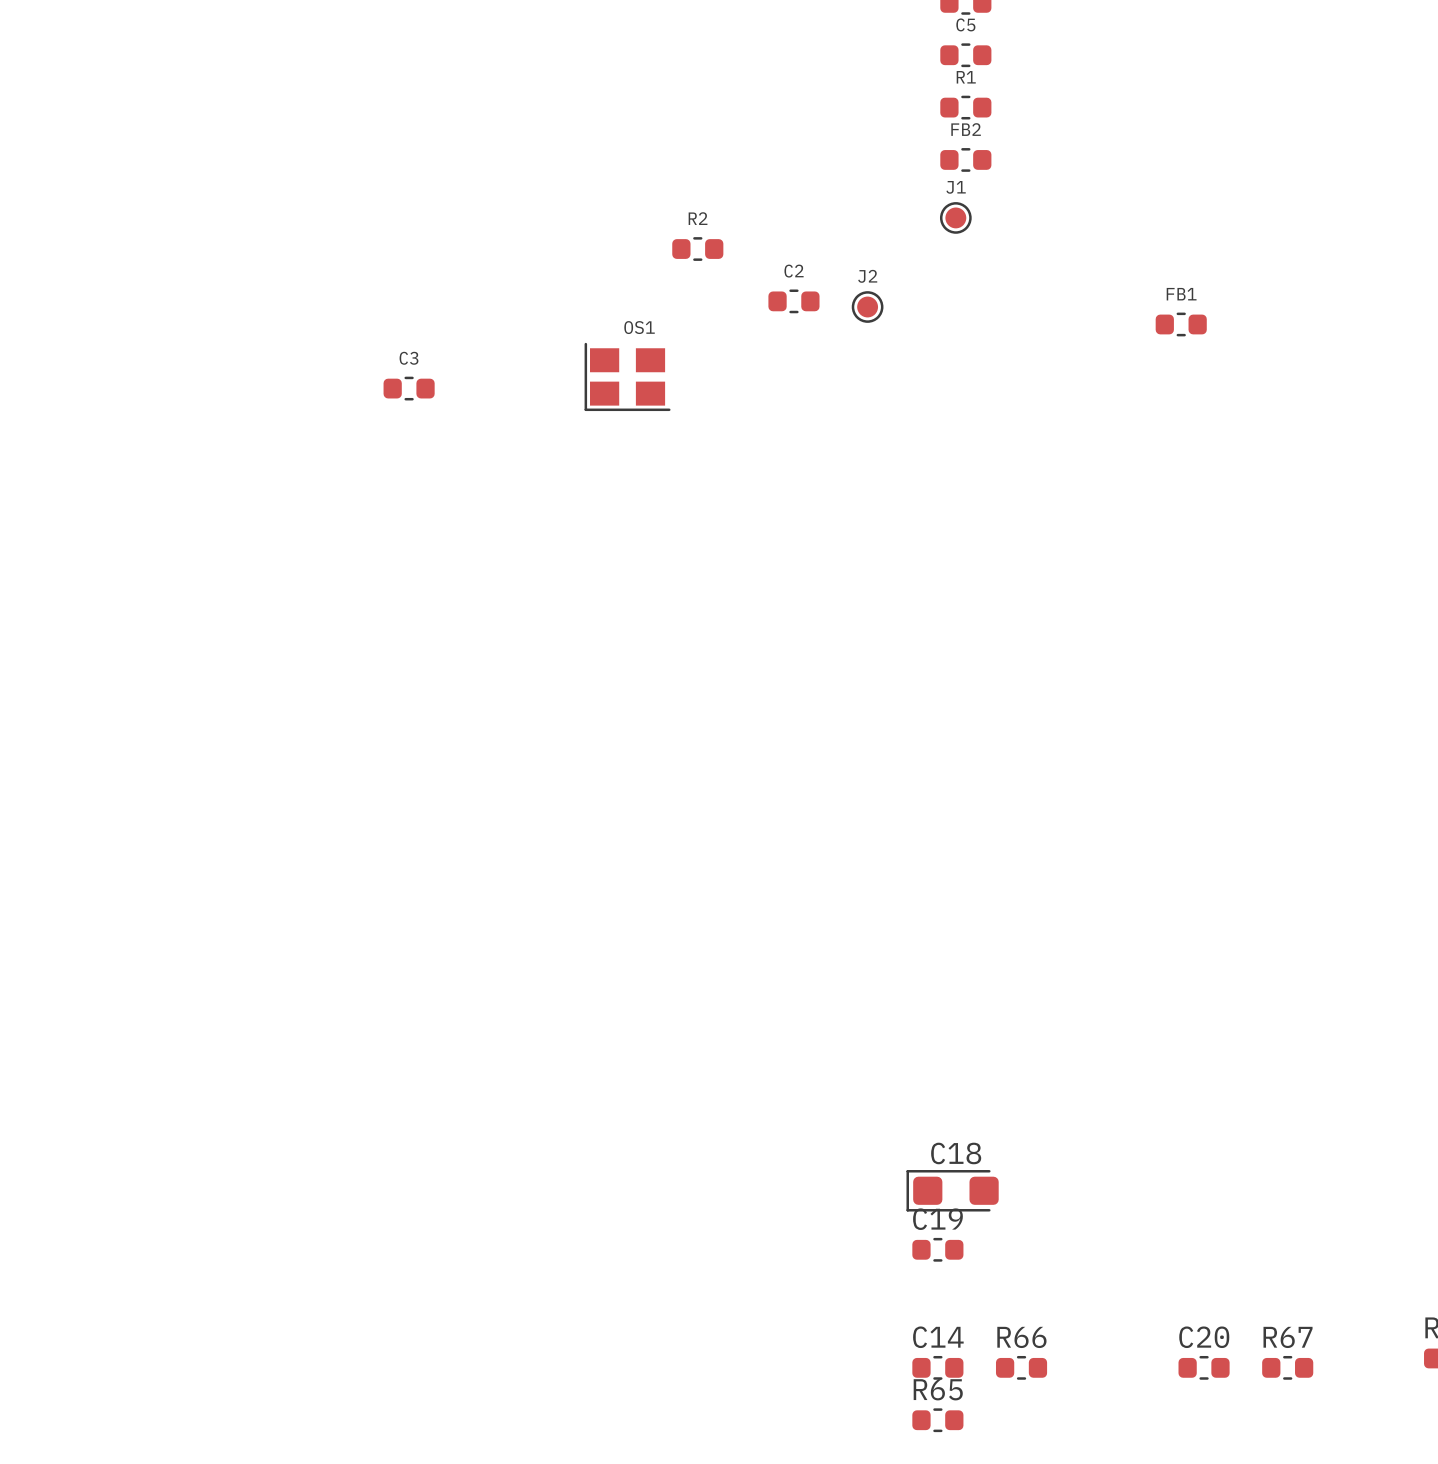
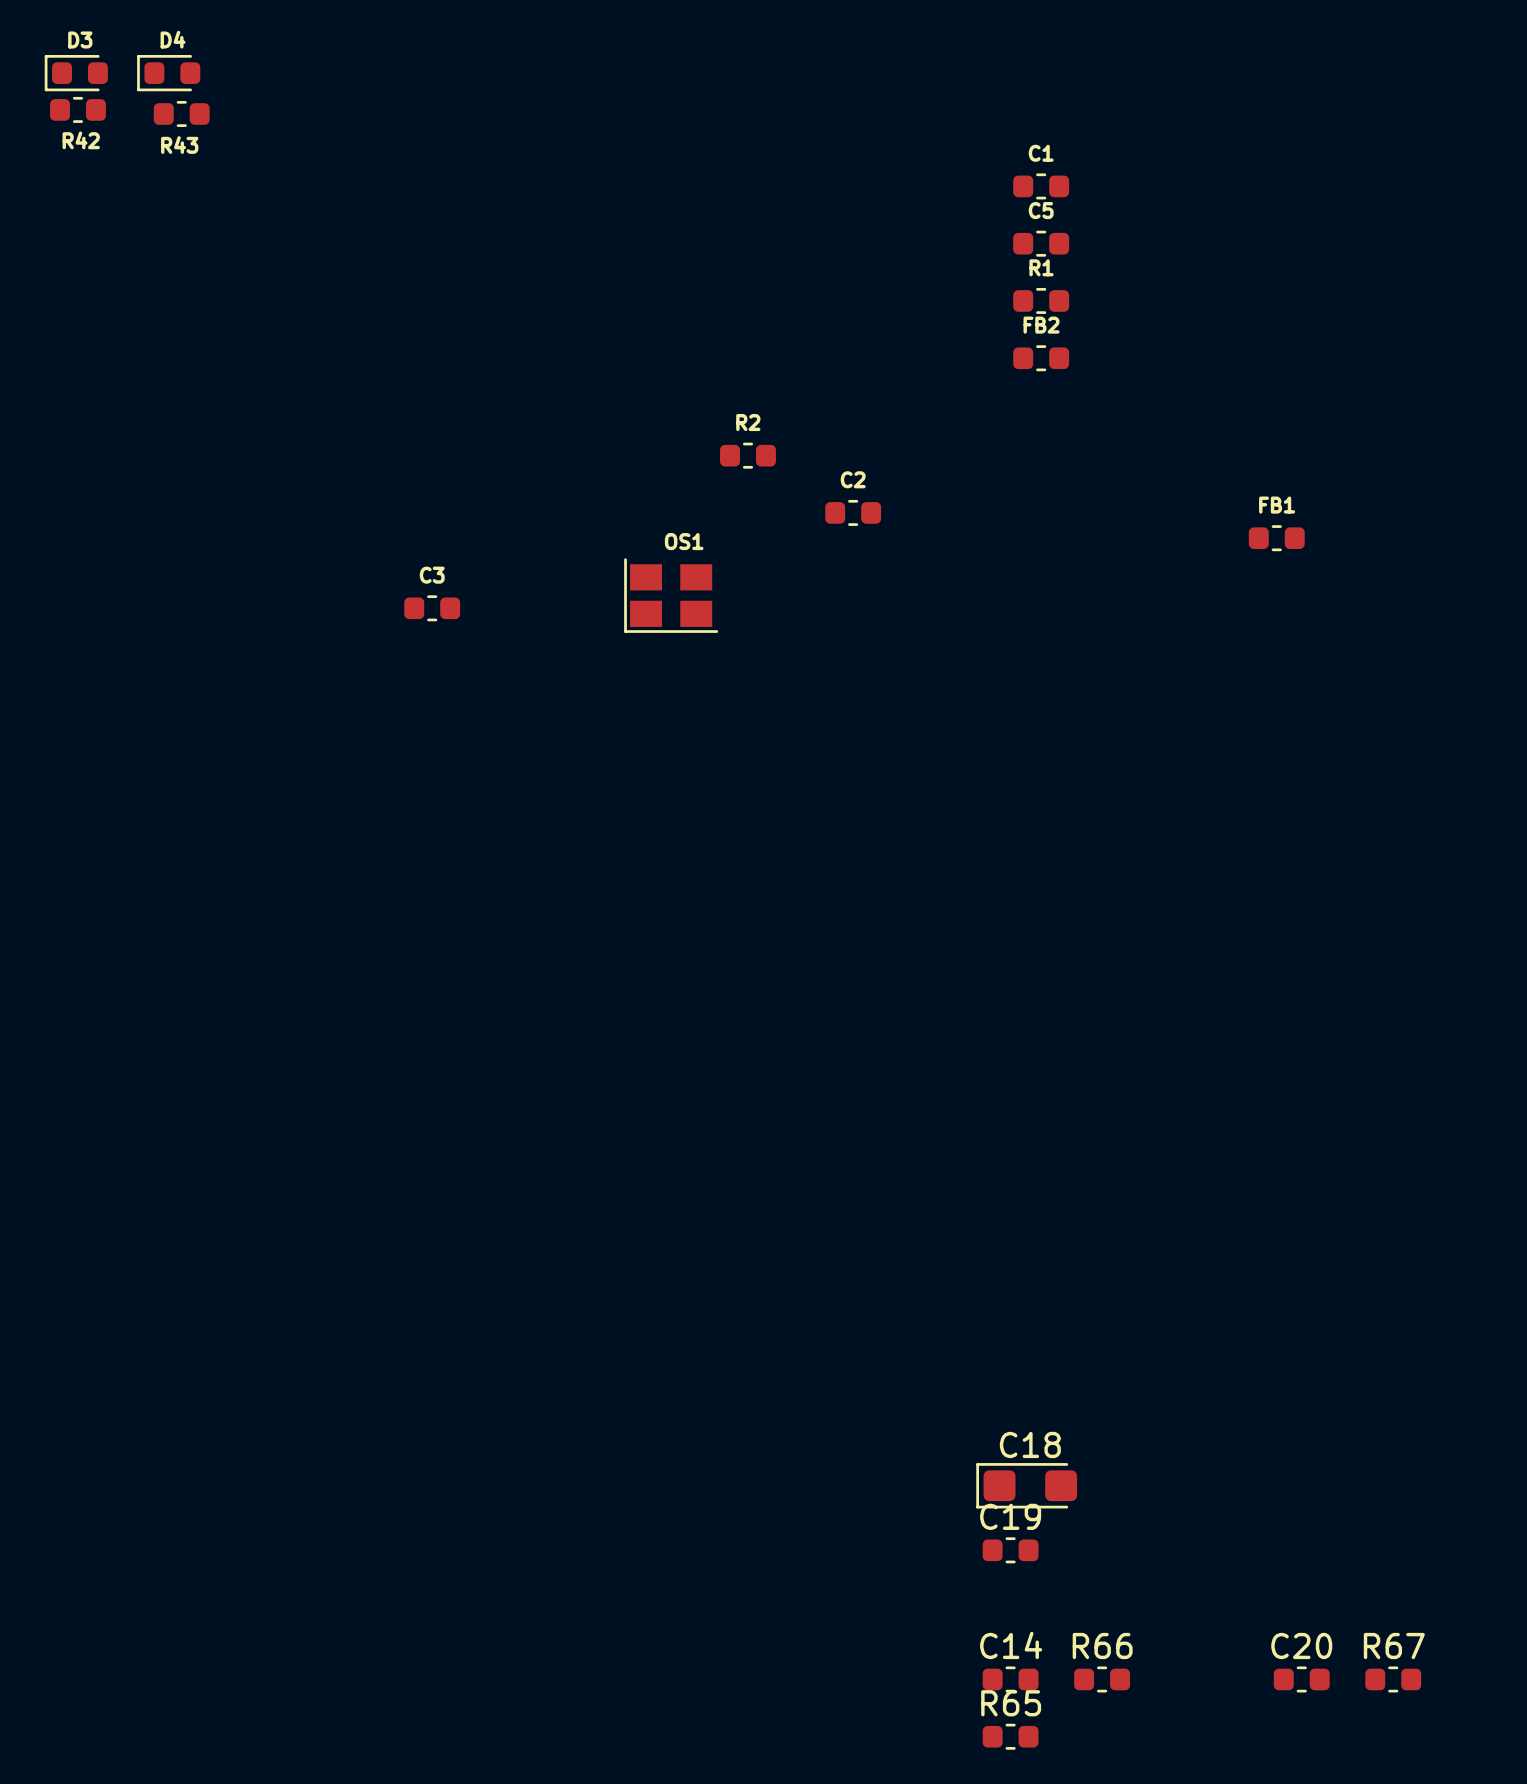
J1: (955, 217) -> none
J2: (867, 307) -> none

